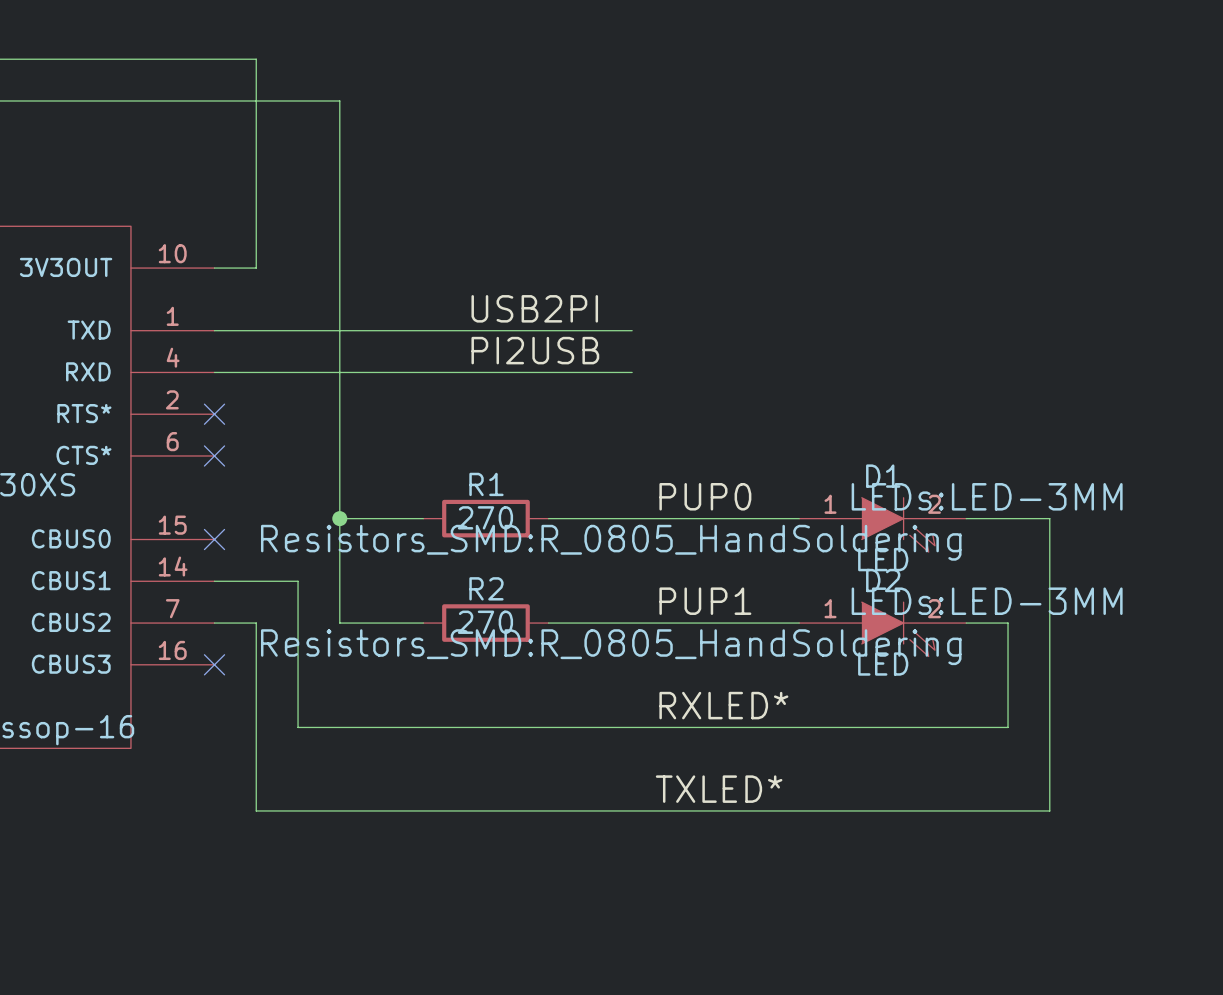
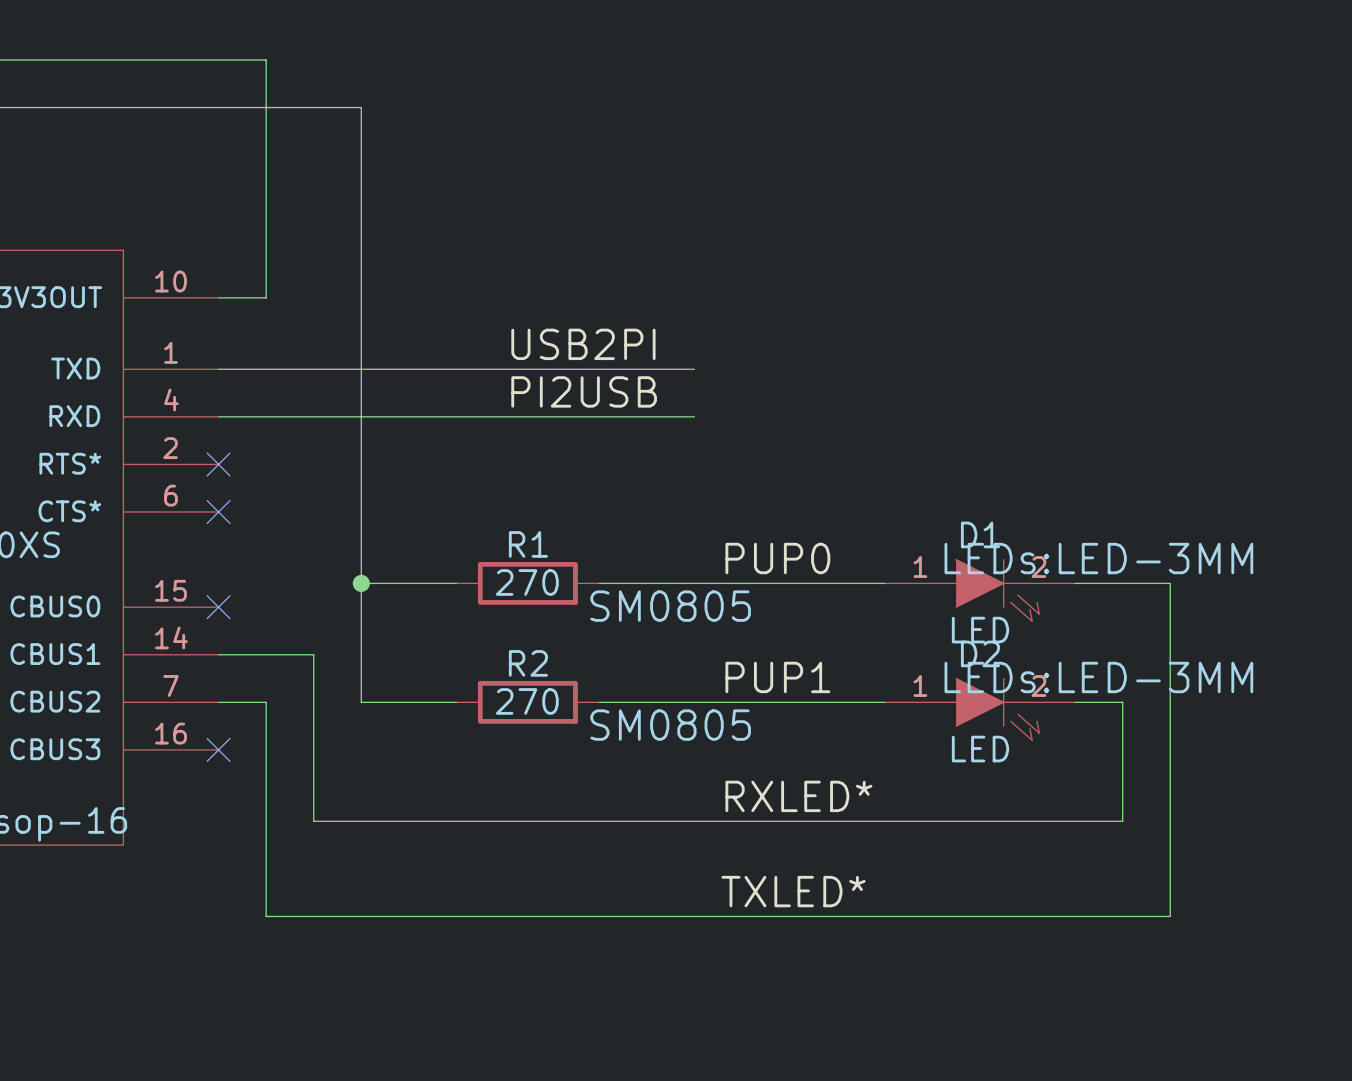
R1 text: Resistors_SMD:R_0805_HandSoldering (611, 542) -> SM0805 (670, 606)
R2 text: Resistors_SMD:R_0805_HandSoldering (611, 647) -> SM0805 (670, 725)

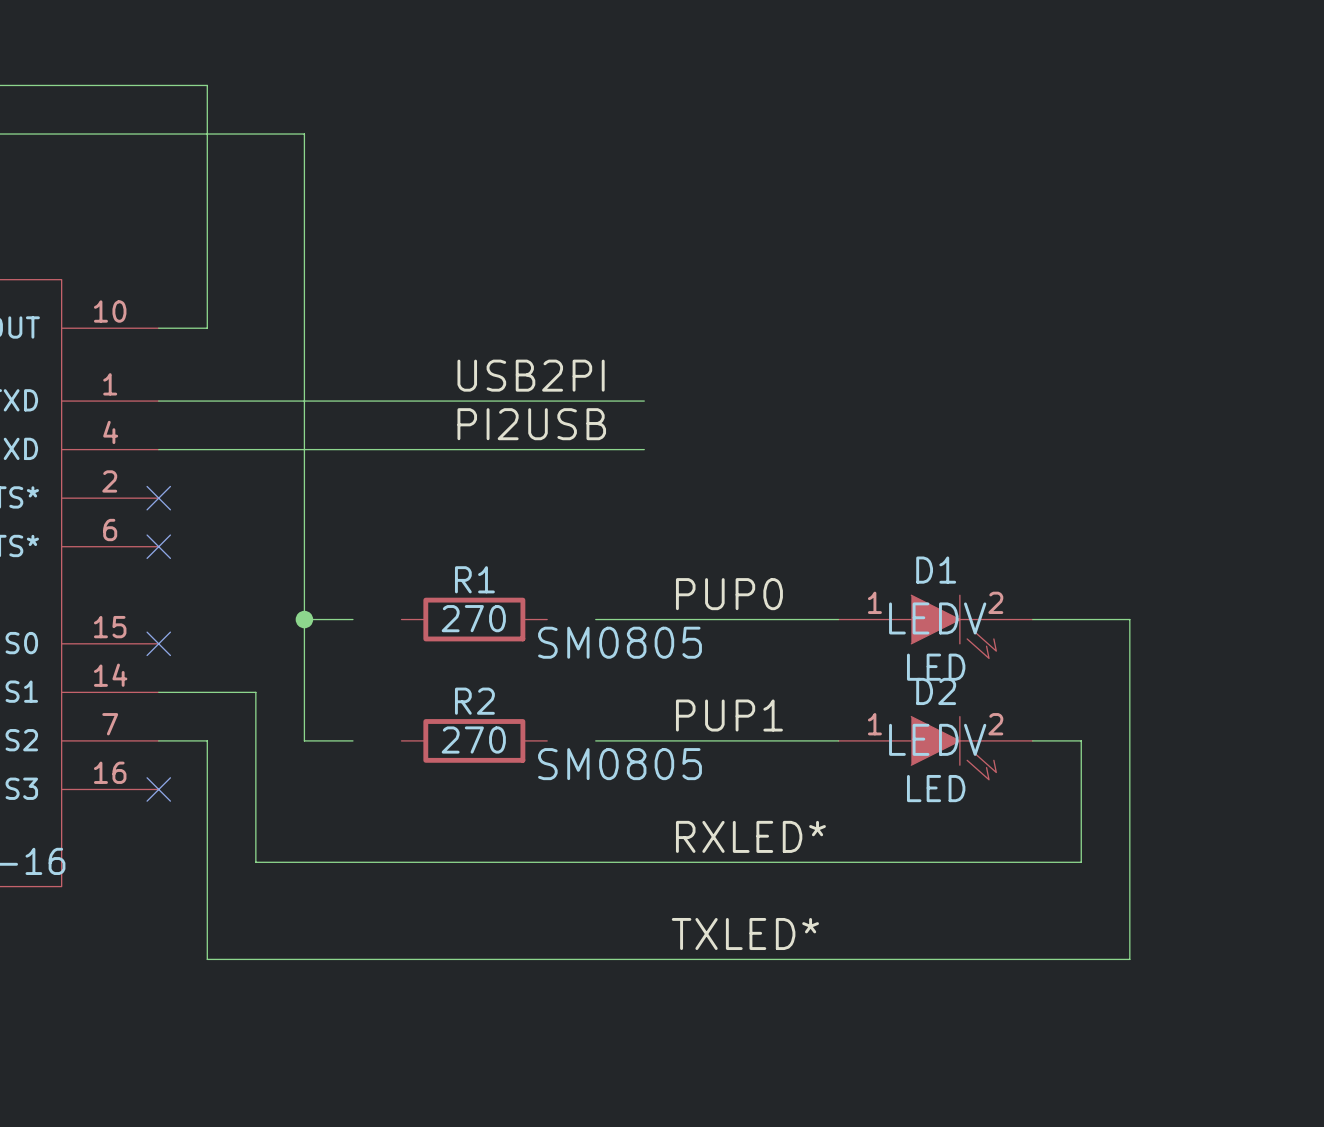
D1 text: LEDs:LED-3MM (1098, 558) -> LEDV (937, 618)
wire: (408, 583) (456, 583) -> none
wire: (599, 583) (646, 583) -> none
D2 text: LEDs:LED-3MM (1098, 677) -> LEDV (937, 739)
wire: (408, 702) (456, 702) -> none
wire: (599, 702) (646, 702) -> none

